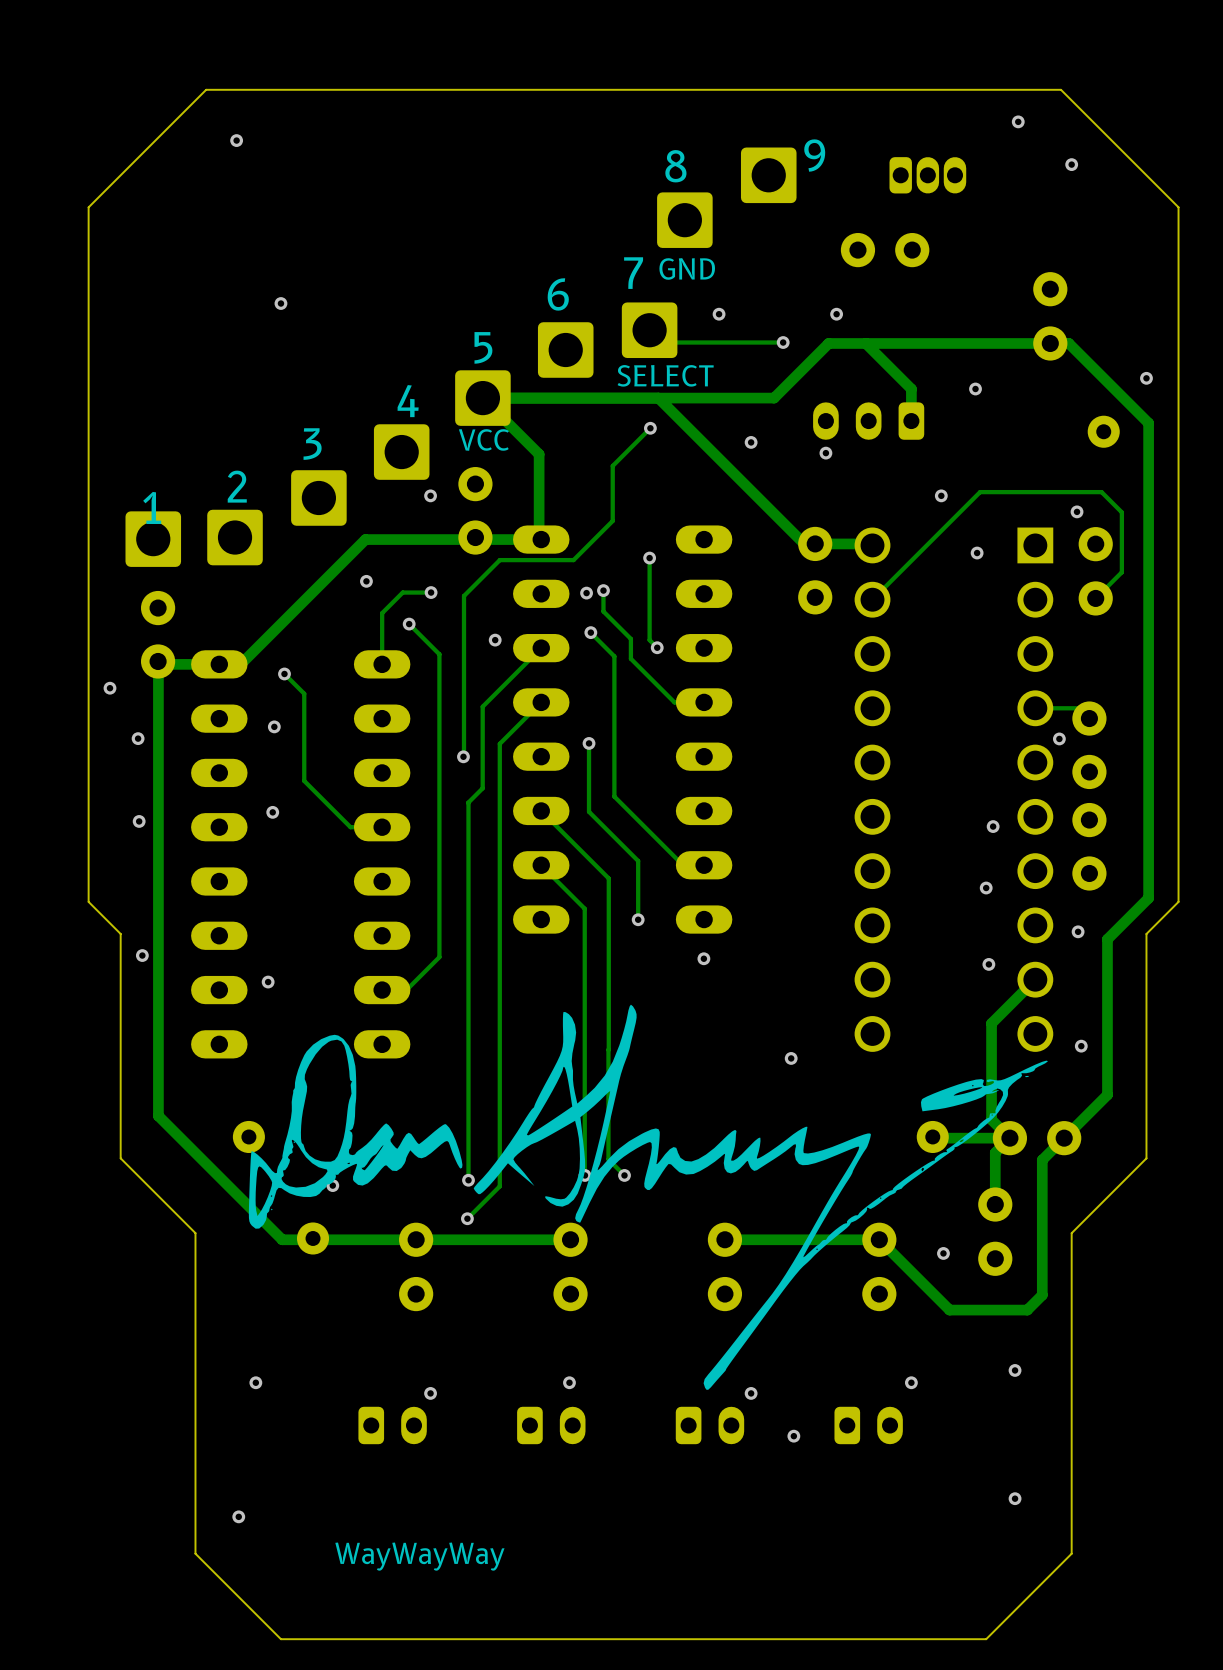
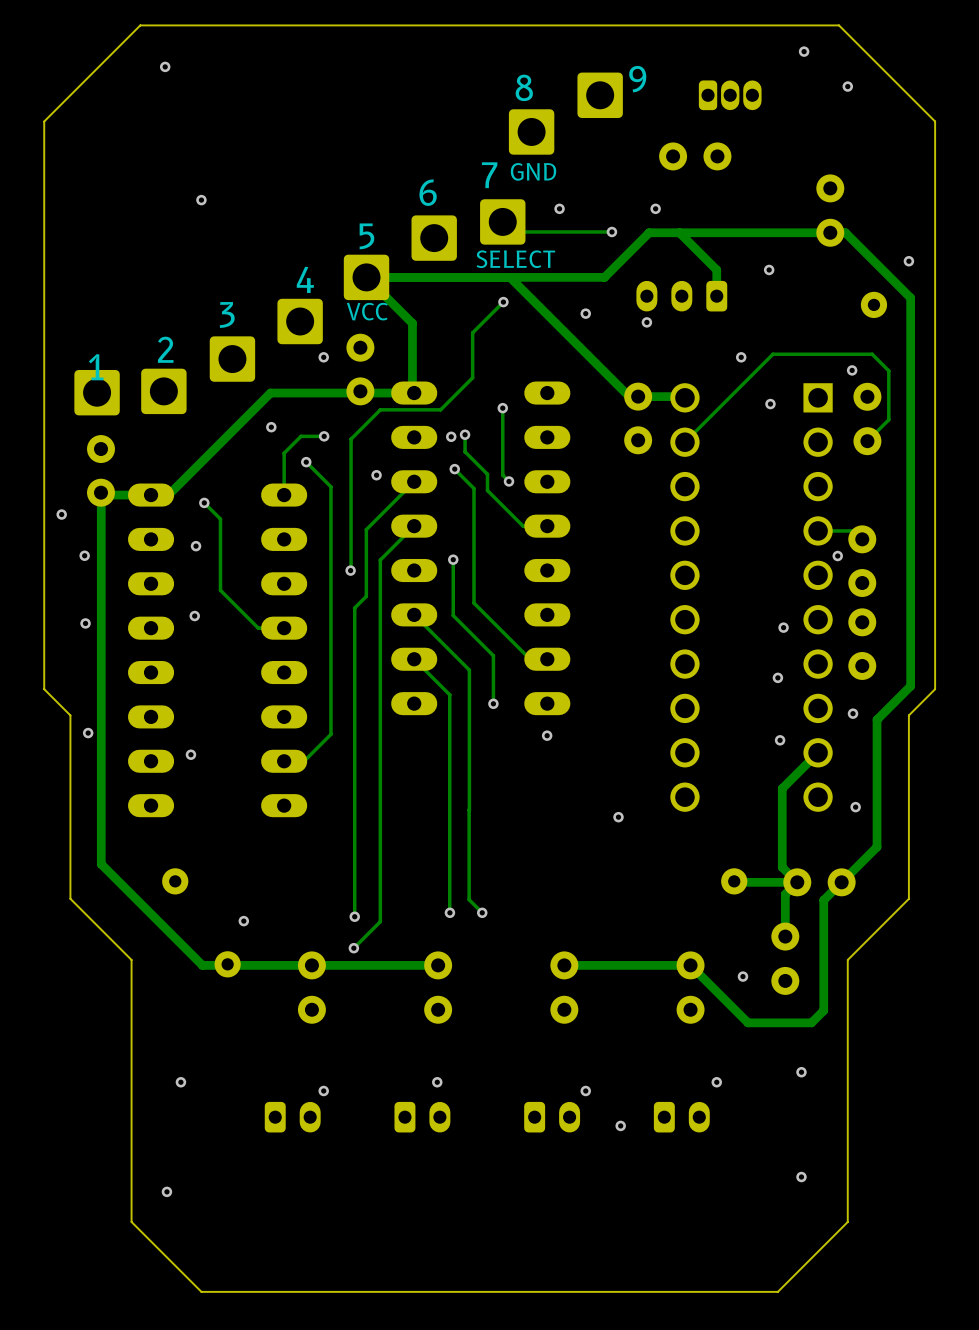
drawing: [248, 1004, 1048, 1390] -> none
text: WayWayWay (419, 1556) -> none

